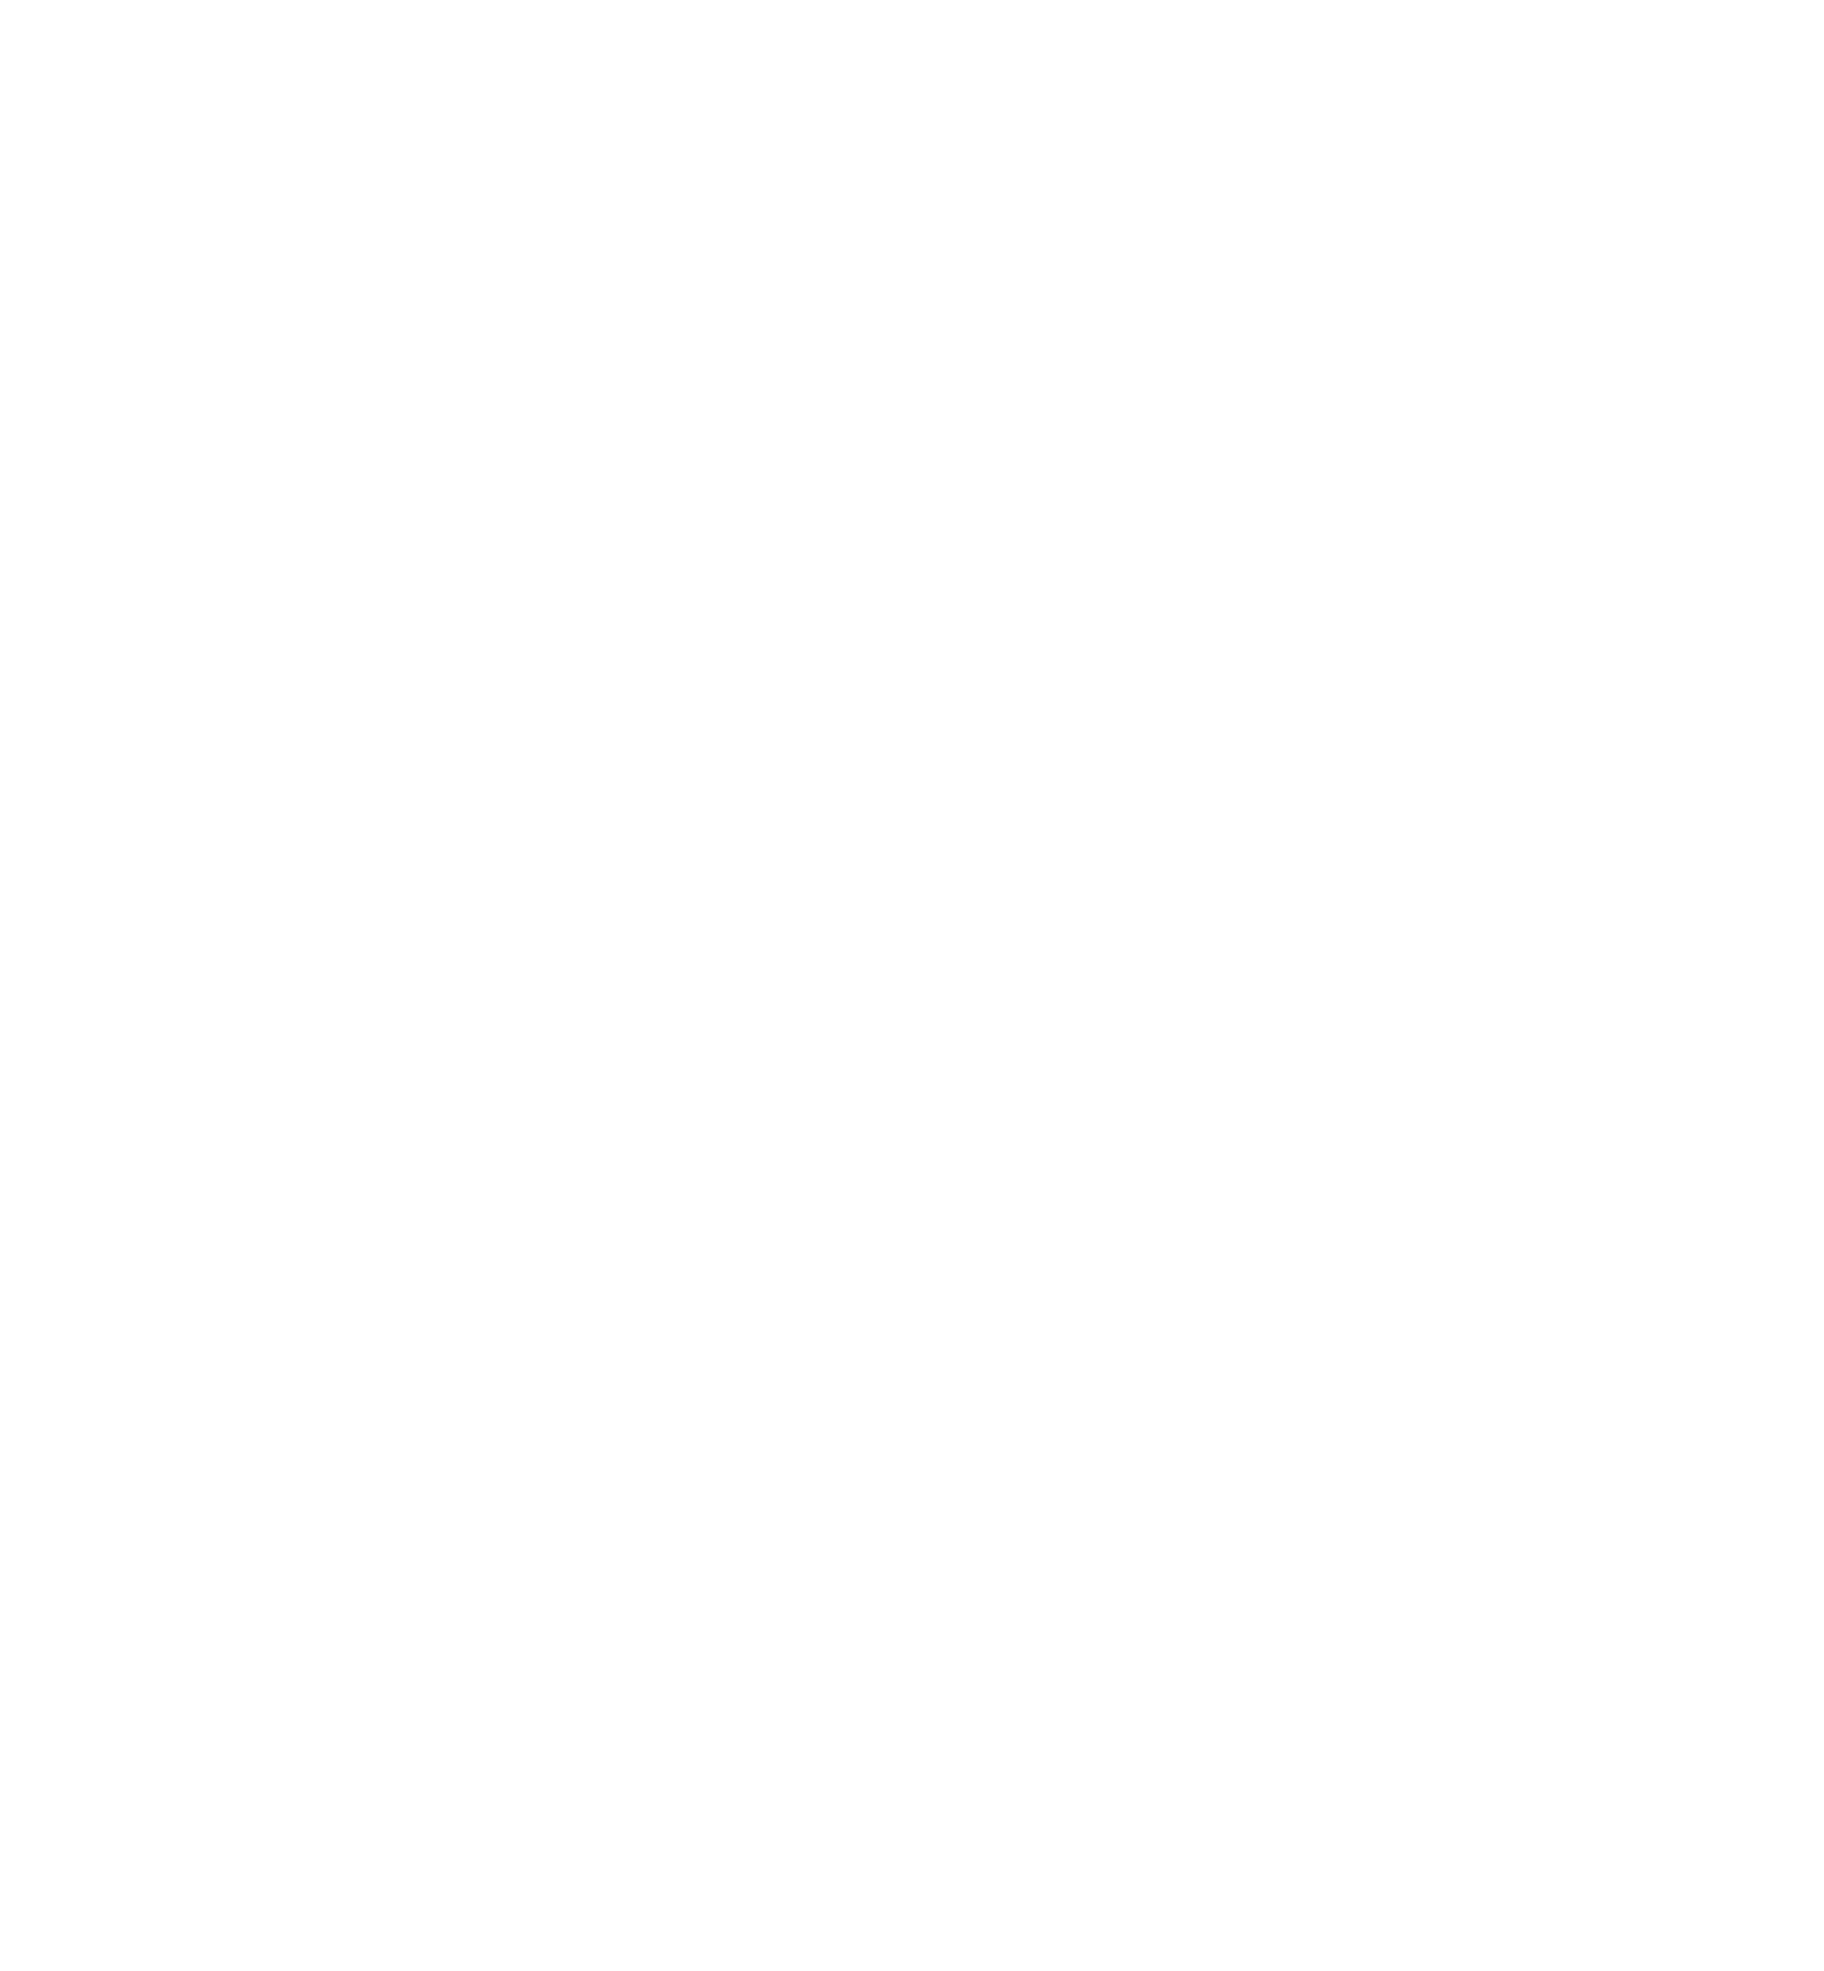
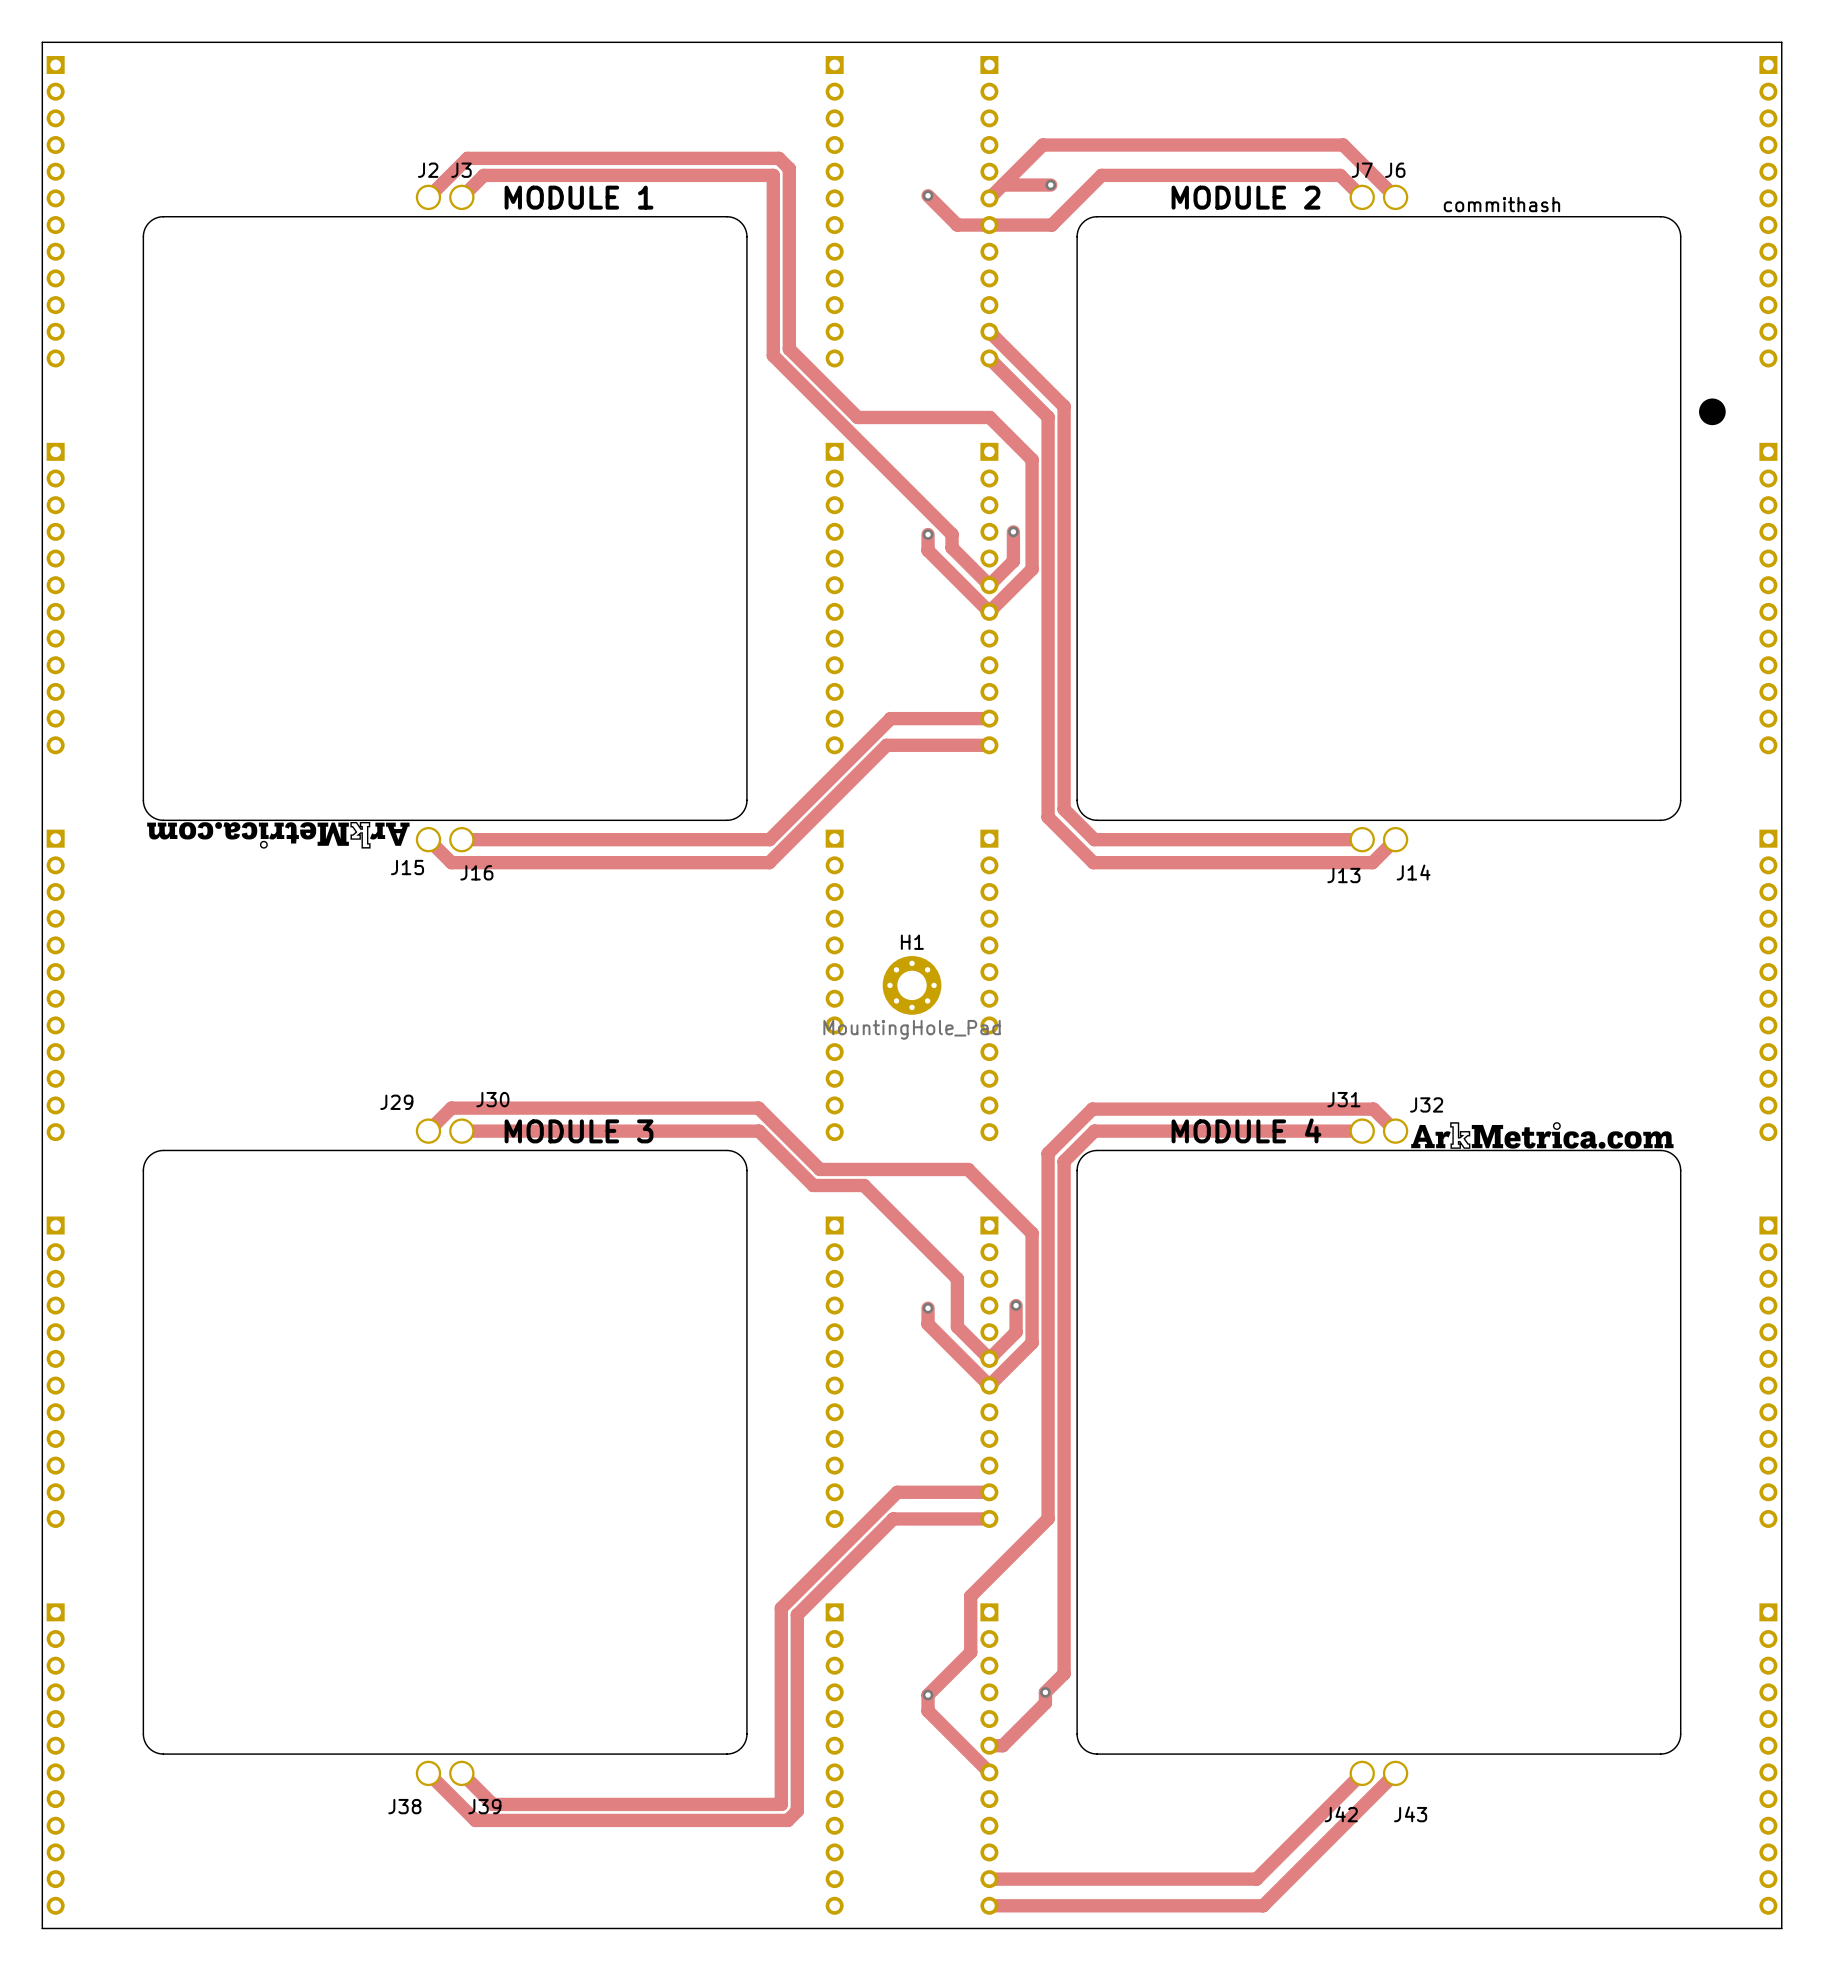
board edge: none -> (42, 42) (42, 1928) (1781, 1928) (1781, 42) (42, 42)
track: none -> (1002, 185) (1050, 185)
via: none -> (1050, 185)
track: none -> (928, 195) (957, 225) (1051, 225) (1101, 175) (1340, 175) (1362, 197)
via: none -> (928, 195)
track: none -> (428, 197) (467, 158) (778, 158) (789, 168) (789, 349) (857, 417) (989, 417) (1032, 459) (1032, 569) (989, 611) (928, 550) (928, 534)
J2: none -> (428, 197)
track: none -> (461, 197) (483, 175) (773, 175) (773, 355) (952, 534) (952, 547) (989, 585) (1013, 561) (1013, 531)
J3: none -> (461, 197)
text: none -> MODULE 1 (579, 197)
text: none -> MODULE 2 (1245, 197)
J7: none -> (1362, 197)
track: none -> (1395, 197) (1343, 145) (1042, 145) (989, 198)
J6: none -> (1395, 197)
text: none -> commithash (1501, 204)
part: none -> (55, 211)
part: none -> (834, 211)
part: none -> (989, 211)
part: none -> (1768, 211)
board edge: none -> (726, 216) (163, 216) (155, 218) (149, 222) (144, 229) (143, 236)
board edge: none -> (726, 216) (734, 218) (741, 222) (745, 229) (746, 236)
board edge: none -> (1097, 216) (1660, 216) (1668, 218) (1674, 222) (1679, 229) (1680, 236) (1680, 800) (1679, 807) (1674, 814) (1668, 818) (1660, 820) (1097, 820) (1089, 818) (1082, 814) (1078, 807) (1077, 800) (1077, 236) (1078, 229) (1082, 222) (1089, 218) (1097, 216)
board edge: none -> (143, 236) (143, 800) (144, 807) (149, 814) (155, 818) (163, 820)
board edge: none -> (746, 236) (746, 800)
track: none -> (989, 331) (1064, 406) (1064, 809) (1094, 839) (1362, 839)
track: none -> (989, 358) (1048, 417) (1048, 817) (1093, 862) (1372, 862) (1395, 839)
drawing: none -> [1699, 398, 1726, 426]
via: none -> (1013, 531)
via: none -> (928, 534)
part: none -> (55, 598)
part: none -> (834, 598)
part: none -> (989, 598)
part: none -> (1768, 598)
track: none -> (989, 718) (890, 718) (769, 839) (461, 839)
track: none -> (989, 745) (886, 745) (769, 862) (451, 862) (428, 839)
board edge: none -> (746, 800) (745, 807) (741, 814) (734, 818) (726, 820) (163, 820)
drawing: none -> [147, 821, 410, 849]
J15: none -> (428, 839)
J16: none -> (461, 839)
J13: none -> (1362, 839)
J14: none -> (1395, 839)
part: none -> (55, 985)
part: none -> (834, 985)
H1: none -> MountingHole_Pad (912, 985)
part: none -> (989, 985)
part: none -> (1768, 985)
drawing: none -> [1411, 1122, 1674, 1149]
text: none -> MODULE 4 (1246, 1130)
track: none -> (428, 1131) (451, 1108) (758, 1108) (819, 1169) (968, 1169) (1032, 1233) (1032, 1342) (989, 1385) (928, 1324) (928, 1308)
J29: none -> (428, 1131)
track: none -> (461, 1131) (758, 1131) (813, 1185) (864, 1185) (957, 1278) (957, 1326) (989, 1358) (1016, 1332) (1016, 1305)
J30: none -> (461, 1131)
text: none -> MODULE 3 (579, 1131)
track: none -> (1362, 1131) (1094, 1131) (1064, 1161) (1064, 1673) (1045, 1692) (1045, 1703) (1002, 1745) (989, 1745)
J31: none -> (1362, 1131)
track: none -> (1395, 1131) (1373, 1109) (1092, 1109) (1048, 1153) (1048, 1518) (970, 1596) (970, 1652) (928, 1695) (928, 1711) (989, 1772)
J32: none -> (1395, 1131)
board edge: none -> (726, 1150) (734, 1151) (741, 1156) (745, 1162) (746, 1170) (746, 1734)
board edge: none -> (726, 1150) (163, 1150) (155, 1151) (149, 1156) (144, 1162) (143, 1170)
board edge: none -> (1660, 1150) (1668, 1151) (1674, 1156) (1679, 1162) (1680, 1170) (1680, 1734)
board edge: none -> (1660, 1150) (1097, 1150) (1089, 1151) (1082, 1156) (1078, 1162) (1077, 1170)
board edge: none -> (143, 1170) (143, 1734) (144, 1741) (149, 1748) (155, 1752) (163, 1754)
board edge: none -> (1077, 1170) (1077, 1734) (1078, 1741) (1082, 1748) (1089, 1752) (1097, 1754)
via: none -> (1016, 1305)
via: none -> (928, 1308)
part: none -> (55, 1372)
part: none -> (834, 1372)
part: none -> (989, 1372)
part: none -> (1768, 1372)
track: none -> (989, 1492) (897, 1492) (781, 1608) (781, 1804) (492, 1804) (461, 1773)
track: none -> (989, 1518) (893, 1518) (797, 1614) (797, 1811) (787, 1820) (475, 1820) (428, 1773)
via: none -> (1045, 1692)
via: none -> (928, 1695)
board edge: none -> (746, 1734) (745, 1741) (741, 1748) (734, 1752) (726, 1754) (163, 1754)
board edge: none -> (1680, 1734) (1679, 1741) (1674, 1748) (1668, 1752) (1660, 1754) (1097, 1754)
part: none -> (55, 1759)
part: none -> (834, 1759)
part: none -> (989, 1759)
part: none -> (1768, 1759)
J38: none -> (428, 1773)
J39: none -> (461, 1773)
track: none -> (1362, 1773) (1256, 1879) (989, 1879)
J42: none -> (1362, 1773)
track: none -> (1395, 1773) (1263, 1905) (989, 1905)
J43: none -> (1395, 1773)

